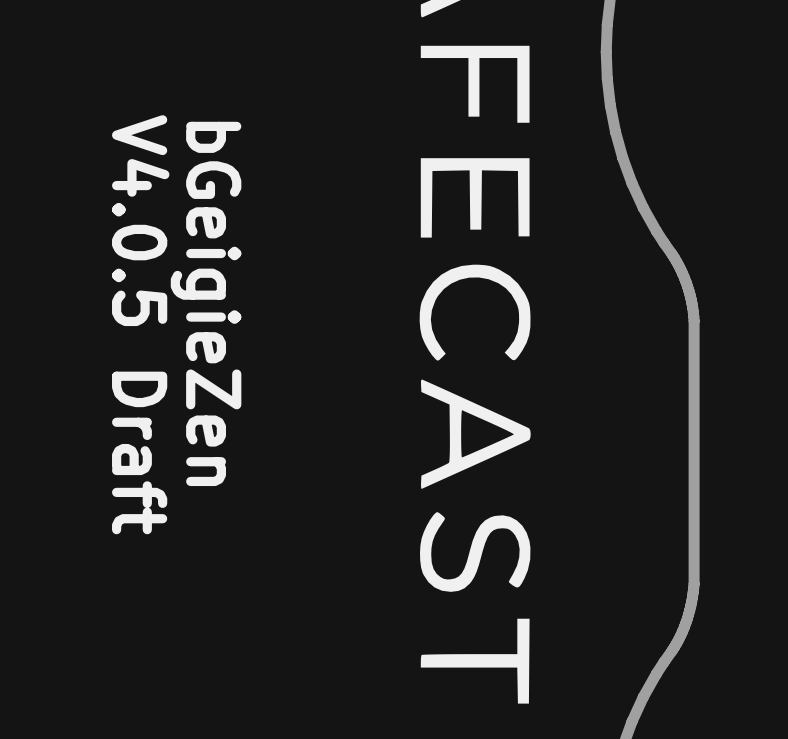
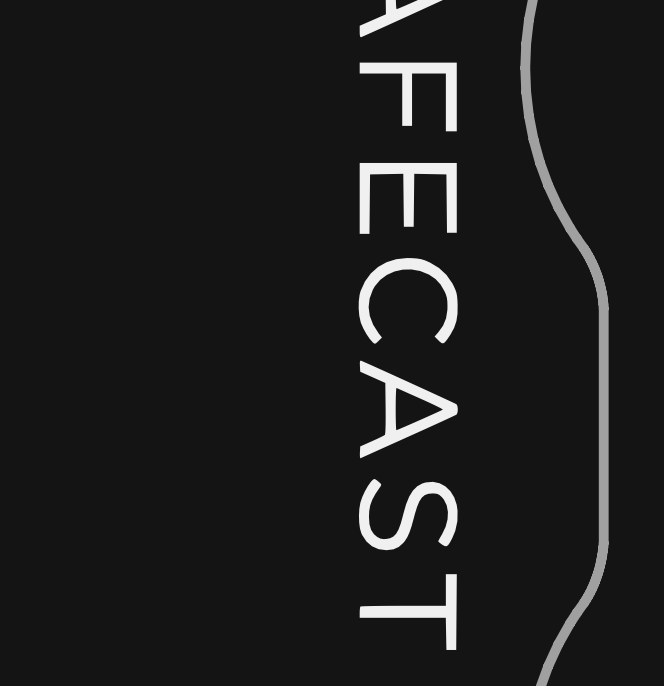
text: bGeigieZen (206, 303) -> none
text: V4.0.5 Draft (140, 324) -> none

